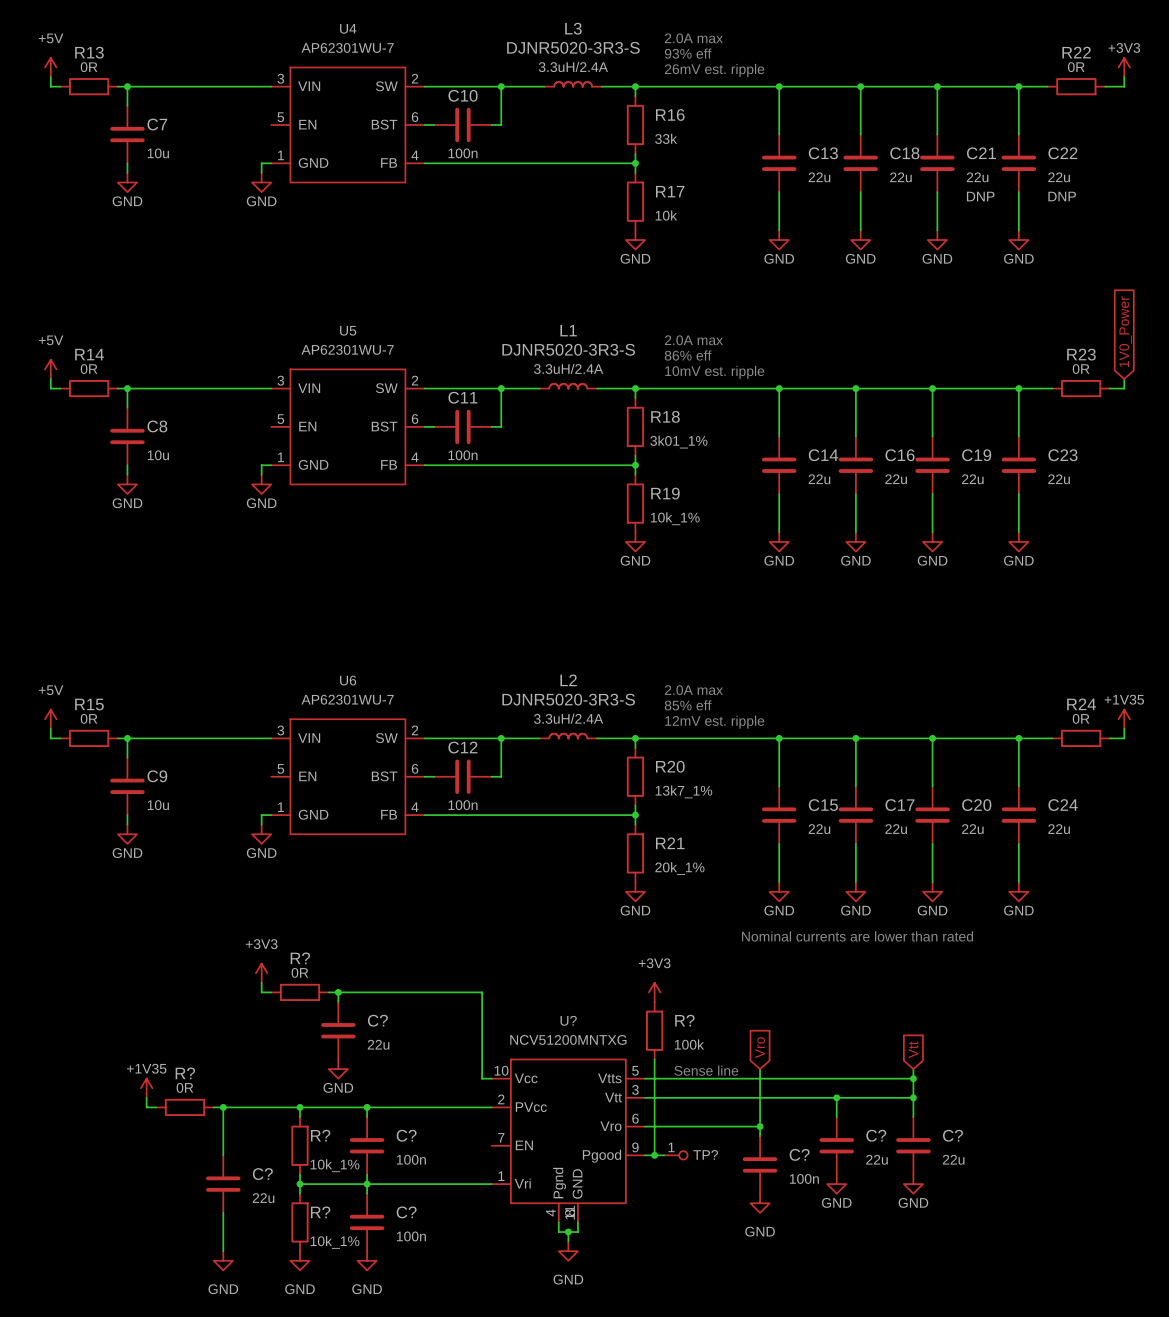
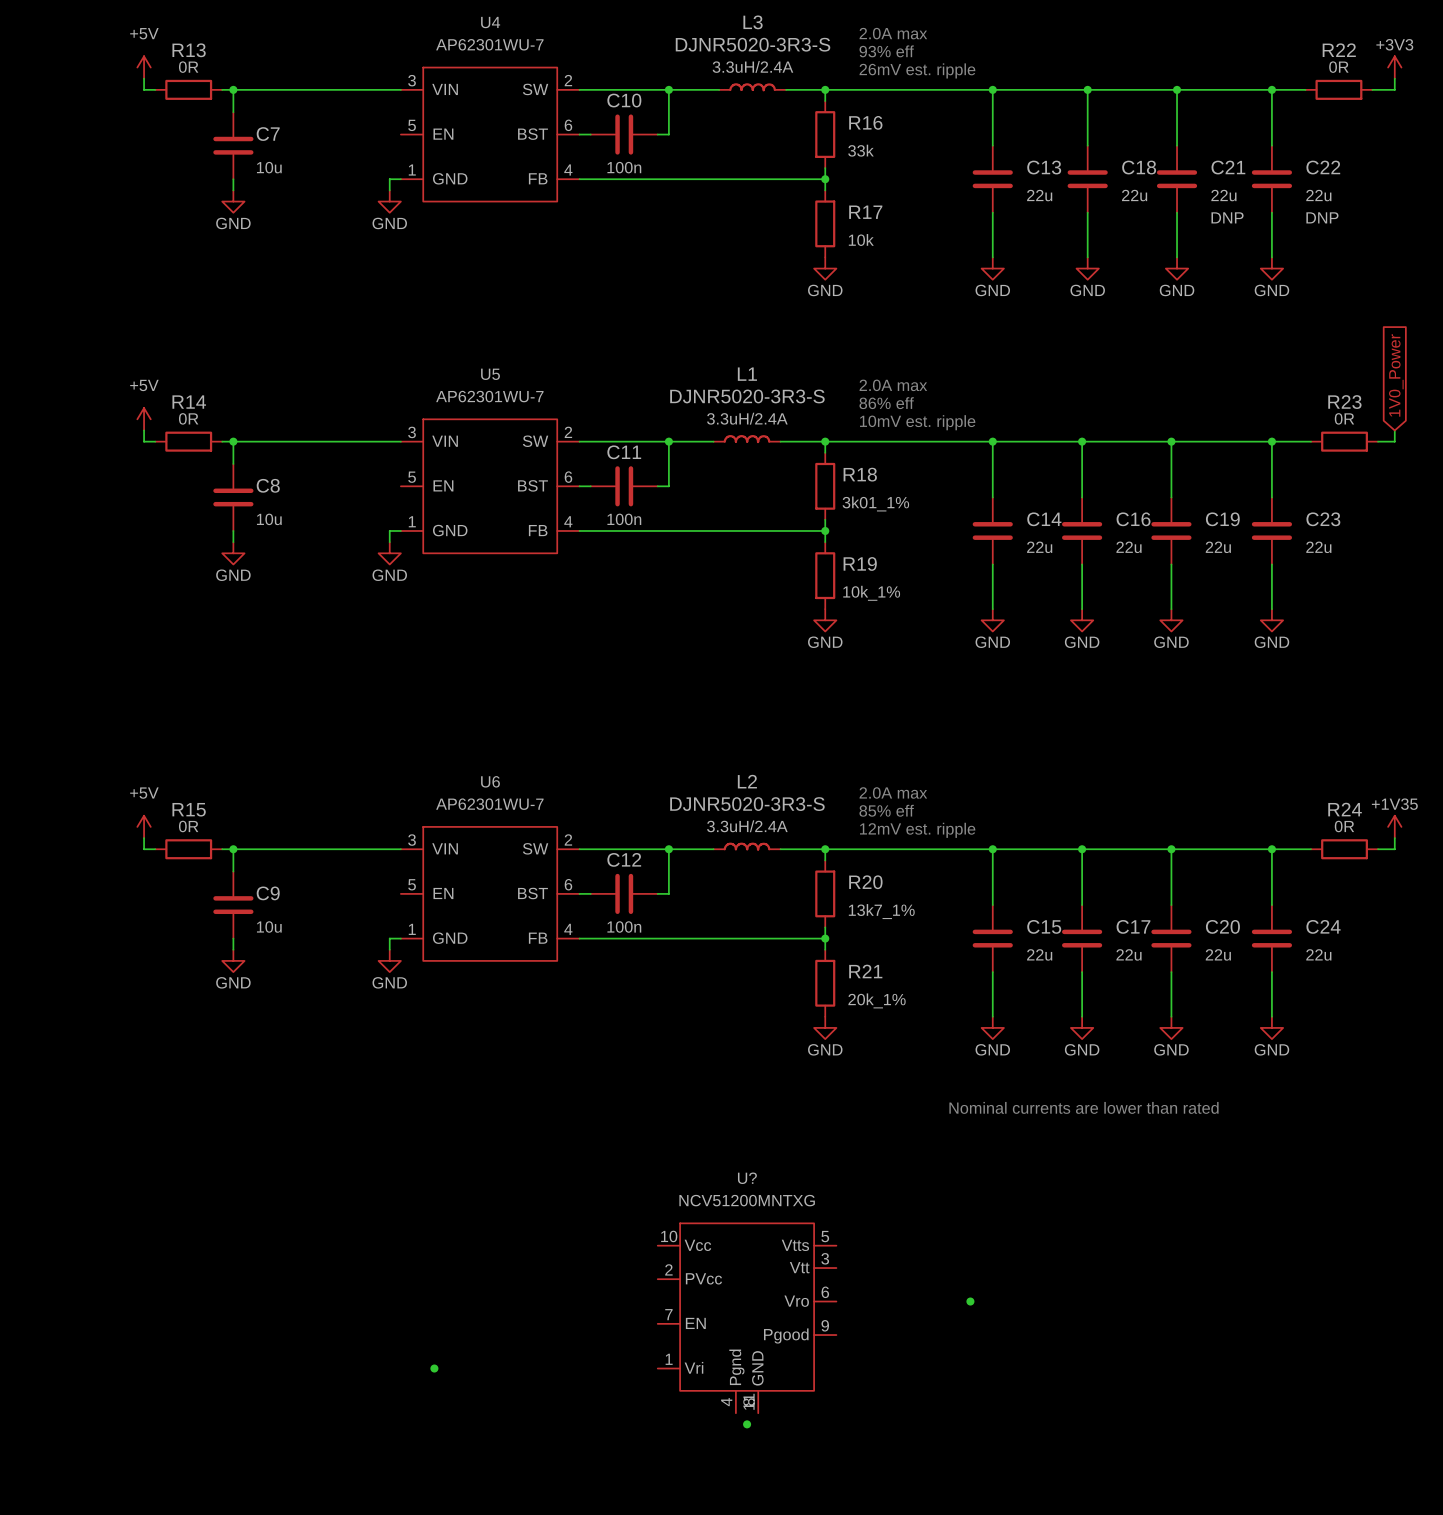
text position: Nominal currents are lower than rated (857, 936) -> Nominal currents are lower than rated (1084, 1107)
power symbol: +3V3 (261, 973) -> none
wire: (261, 982) (261, 992) (271, 992) -> none
R?: (299, 992) -> none
wire: (328, 992) (482, 992) (482, 1078) (491, 1078) -> none
wire: (338, 992) (338, 1001) -> none
junction: (338, 992) -> none
power symbol: +3V3 (654, 992) -> none
C?: (338, 1030) -> none
R?: (654, 1030) -> none
global label: Vro (760, 1047) -> none
global label: Vtt (913, 1049) -> none
wire: (654, 1059) (654, 1155) -> none
power symbol: GND (338, 1069) -> none
wire: (760, 1069) (760, 1136) -> none
wire: (913, 1069) (913, 1117) -> none
text: Sense line (706, 1070) -> none
wire: (645, 1078) (913, 1078) -> none
junction: (913, 1078) -> none
power symbol: +1V35 (146, 1088) -> none
wire: (146, 1097) (146, 1107) (156, 1107) -> none
wire: (645, 1097) (913, 1097) -> none
wire: (836, 1097) (836, 1117) -> none
junction: (836, 1097) -> none
junction: (913, 1097) -> none
R?: (184, 1107) -> none
wire: (213, 1107) (491, 1107) -> none
wire: (223, 1107) (223, 1155) -> none
junction: (223, 1107) -> none
wire: (299, 1107) (299, 1117) -> none
junction: (299, 1107) -> none
wire: (367, 1107) (367, 1117) -> none
junction: (367, 1107) -> none
wire: (645, 1126) (760, 1126) -> none
R?: (299, 1145) -> none
C?: (367, 1145) -> none
C?: (836, 1145) -> none
C?: (913, 1145) -> none
wire: (645, 1155) (664, 1155) -> none
junction: (654, 1155) -> none
TP?: (675, 1155) -> none
C?: (760, 1164) -> none
wire: (299, 1174) (299, 1193) -> none
wire: (367, 1174) (367, 1193) -> none
C?: (223, 1184) -> none
wire: (299, 1184) (491, 1184) -> none
junction: (367, 1184) -> none
power symbol: GND (836, 1184) -> none
power symbol: GND (913, 1184) -> none
power symbol: GND (760, 1203) -> none
wire: (223, 1212) (223, 1251) -> none
R?: (299, 1222) -> none
C?: (367, 1222) -> none
wire: (558, 1222) (558, 1232) (577, 1232) (577, 1222) -> none
wire: (568, 1232) (568, 1241) -> none
power symbol: GND (568, 1251) -> none
power symbol: GND (223, 1260) -> none
power symbol: GND (299, 1260) -> none
power symbol: GND (367, 1260) -> none

